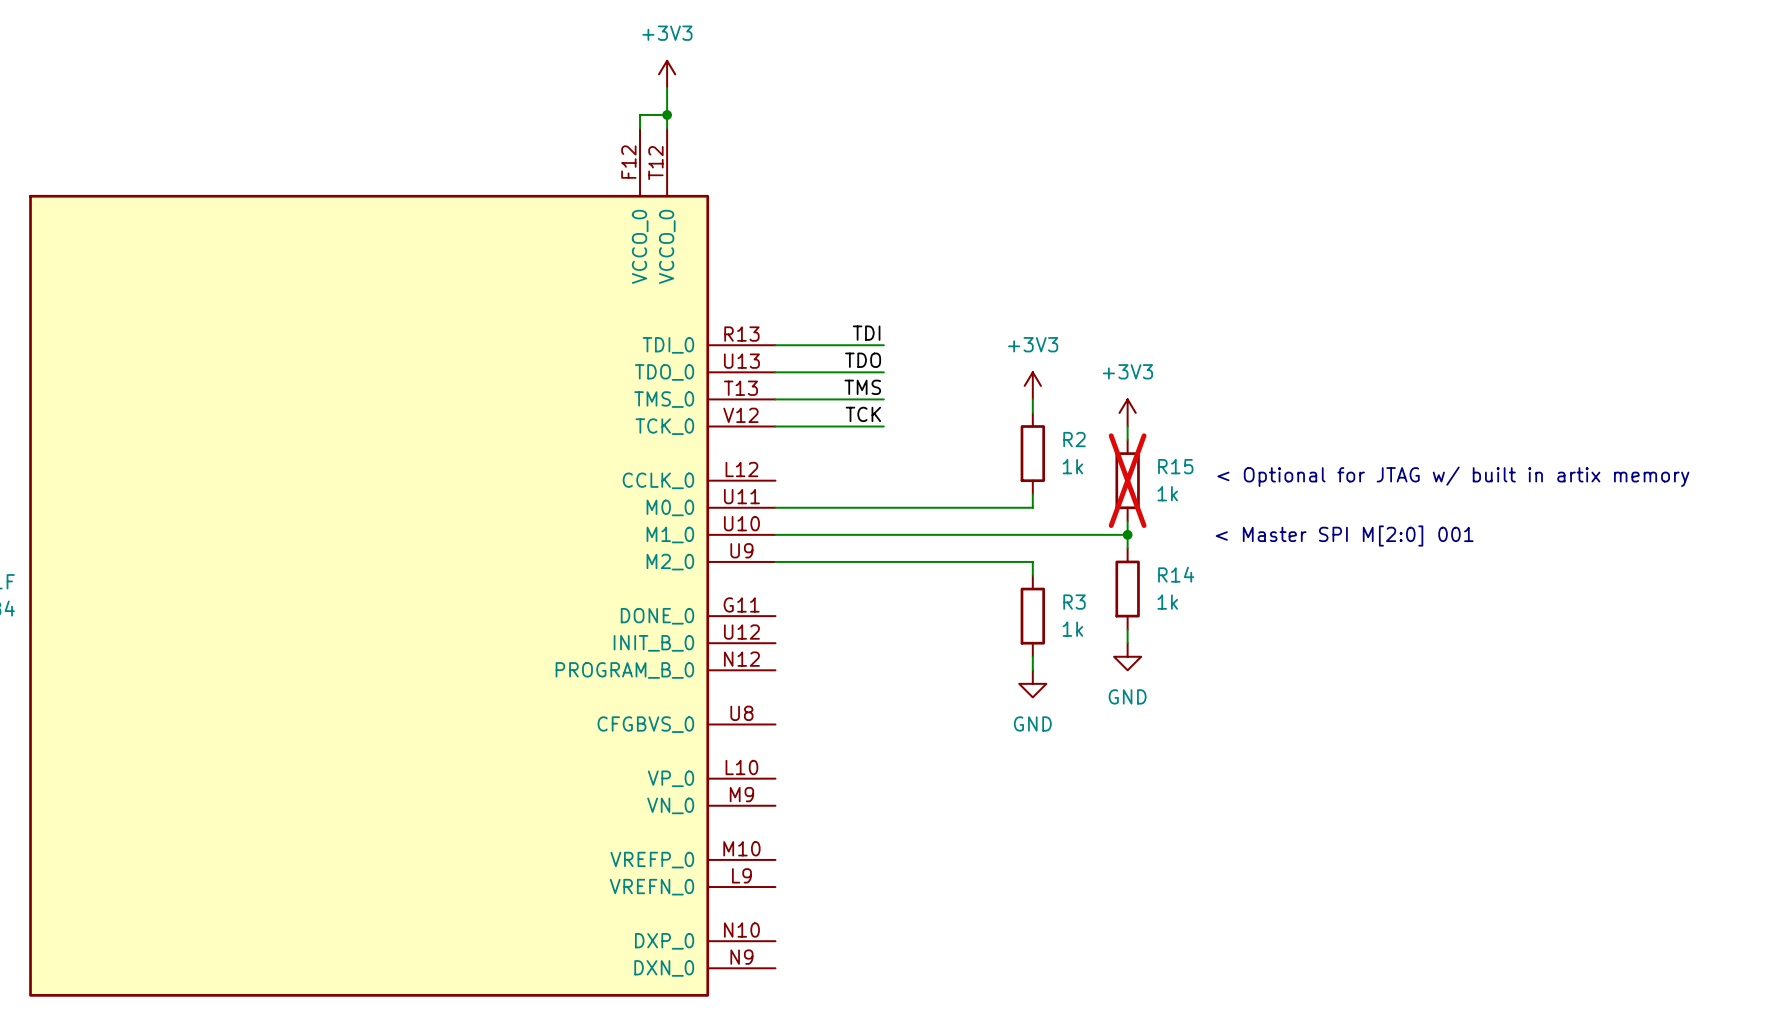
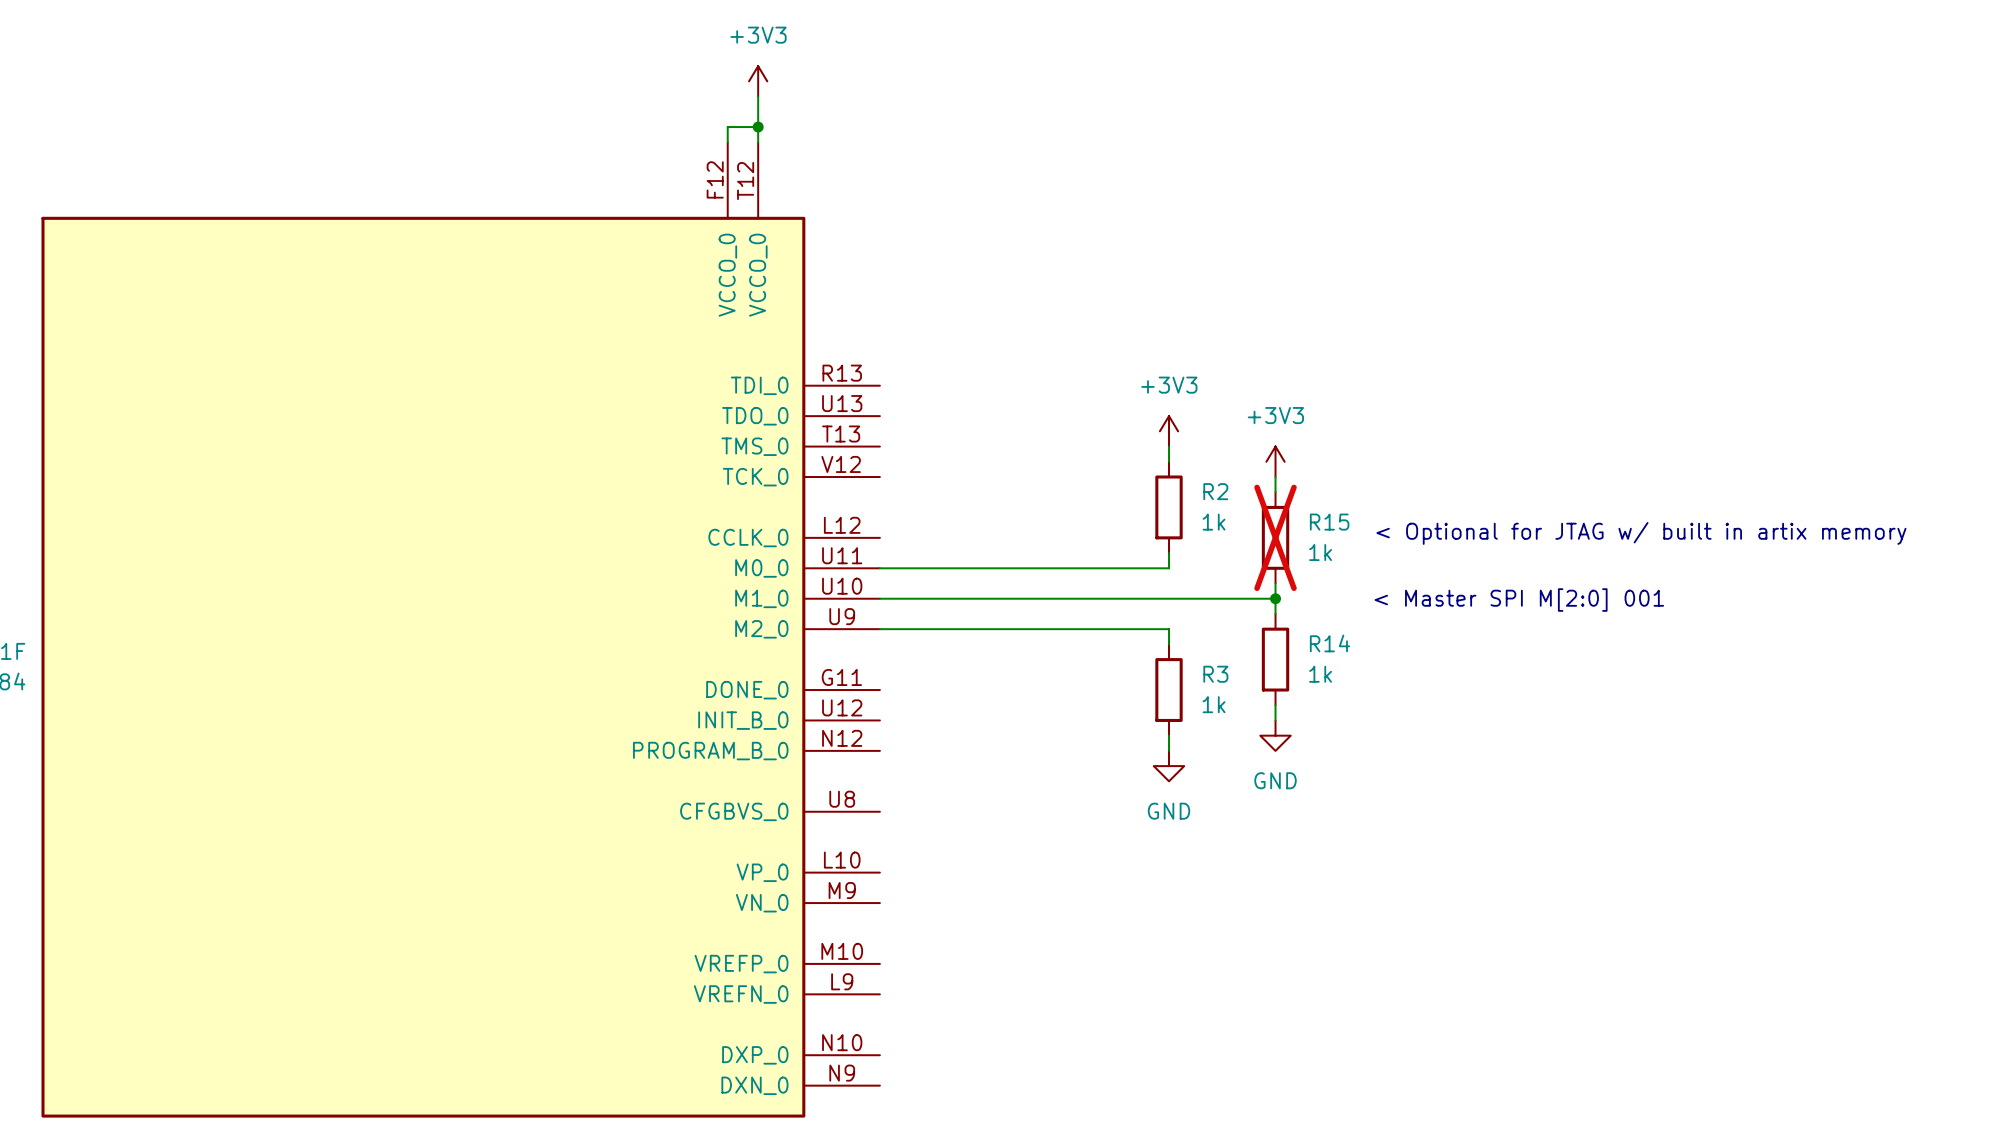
label: TDI (866, 333) -> none
wire: (775, 345) (883, 345) -> none
label: TDO (863, 360) -> none
wire: (775, 372) (883, 372) -> none
label: TMS (862, 387) -> none
wire: (775, 399) (883, 399) -> none
label: TCK (863, 414) -> none
wire: (775, 426) (883, 426) -> none

